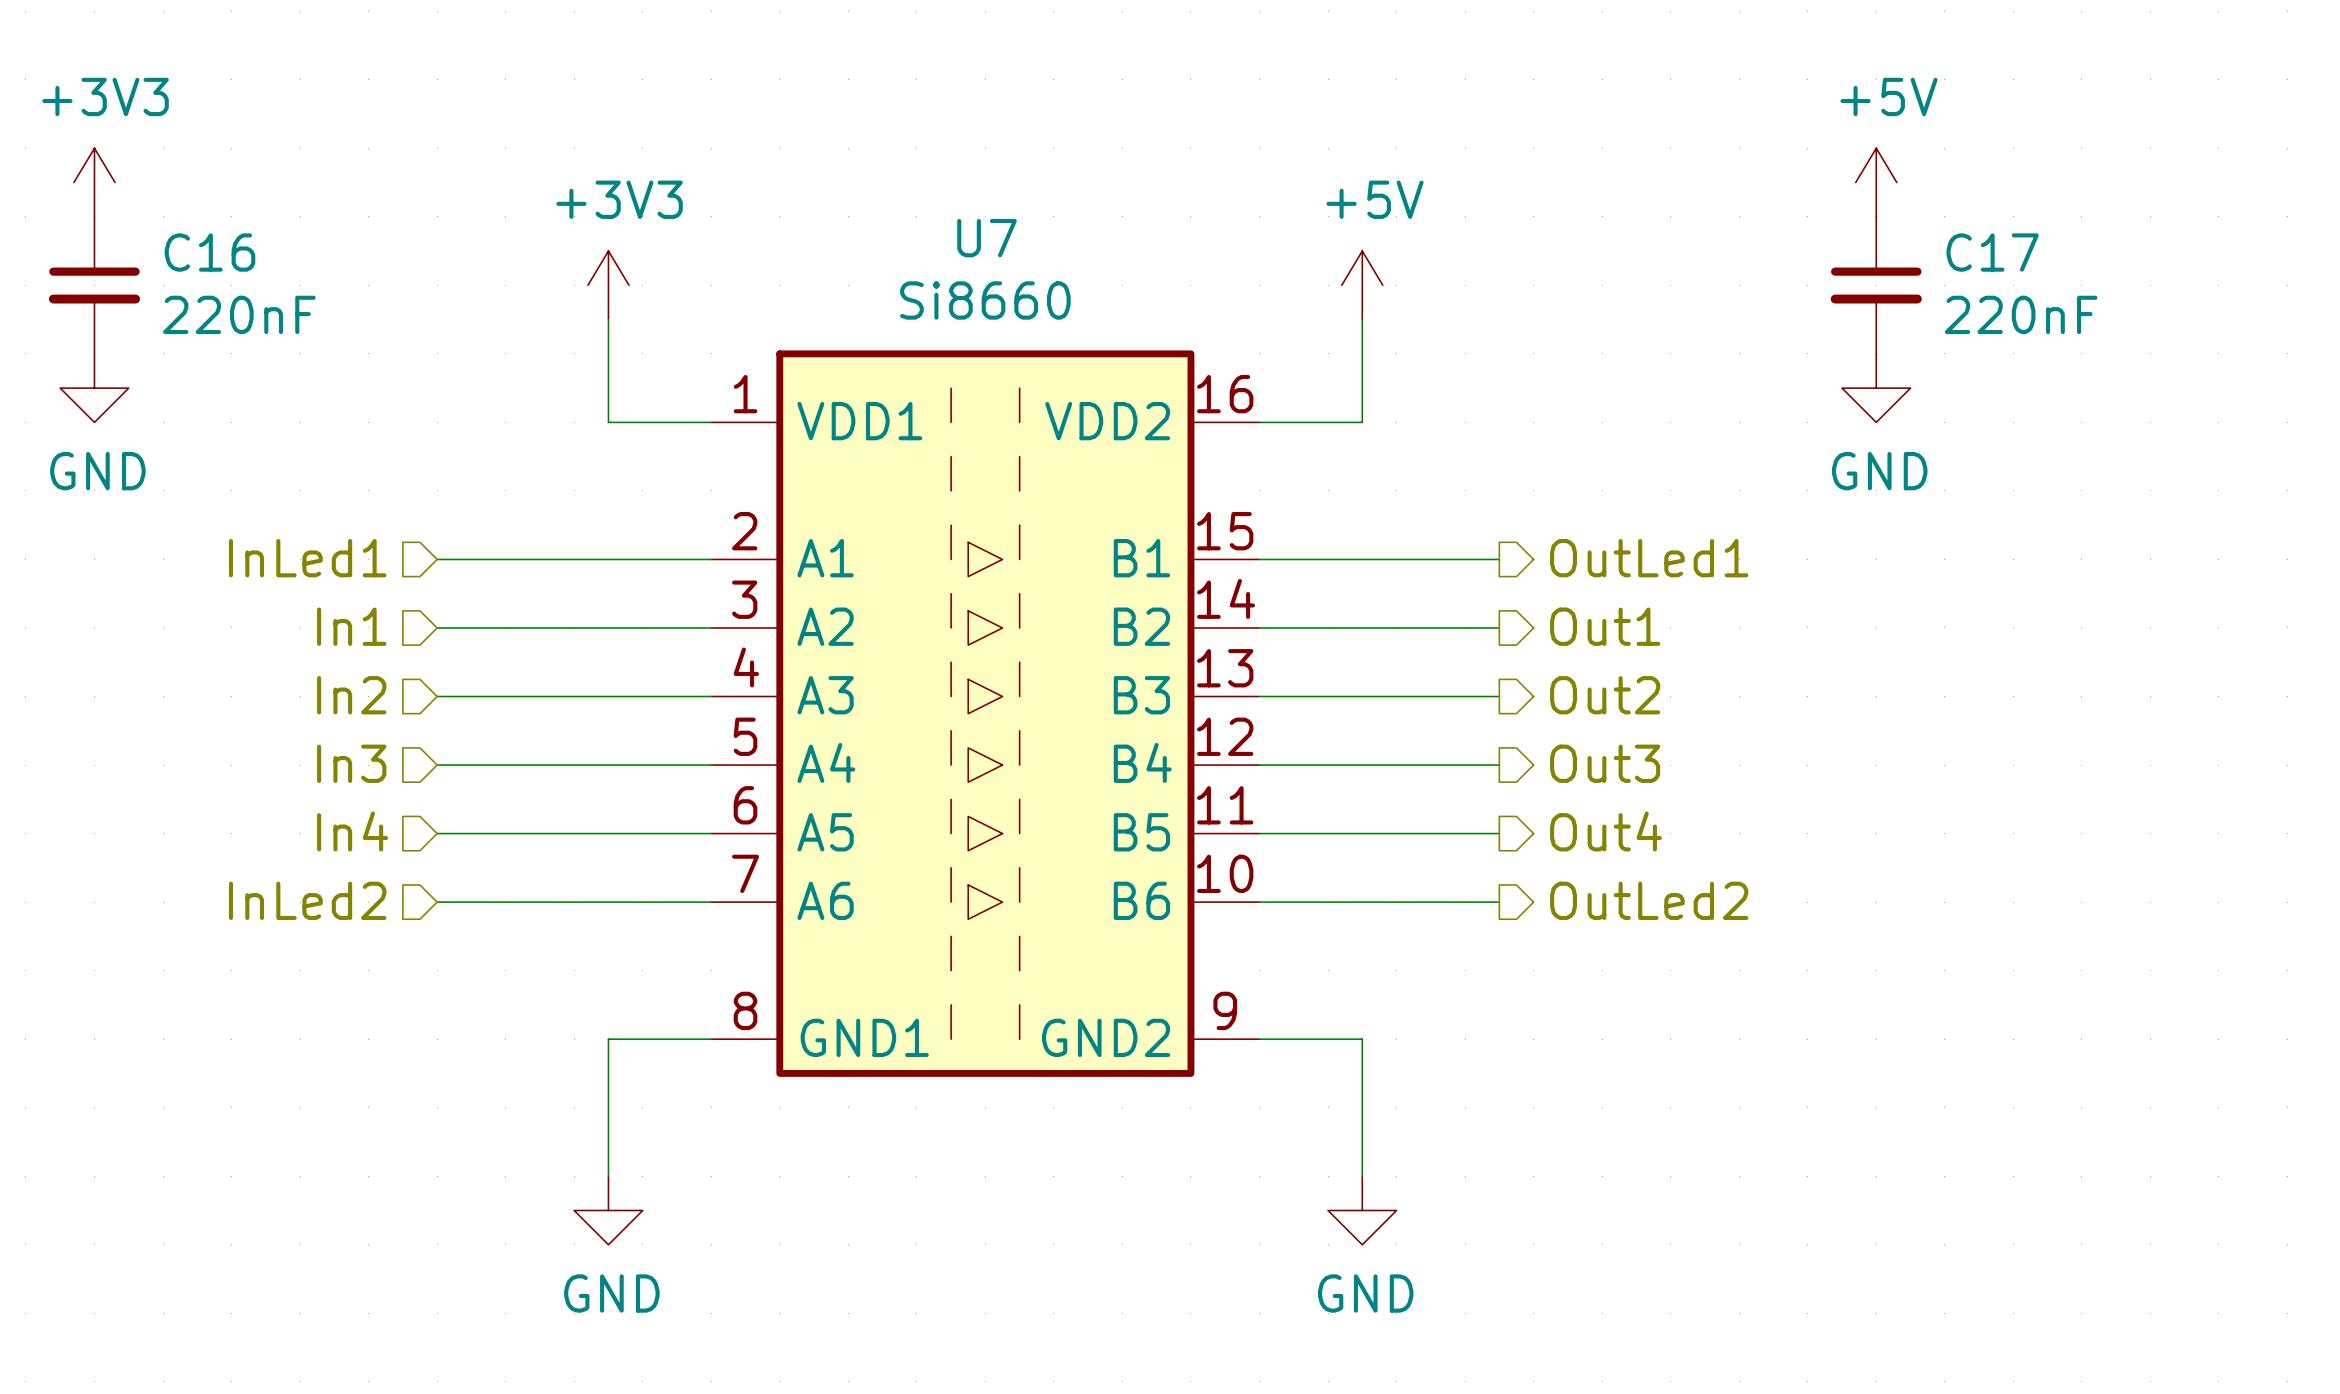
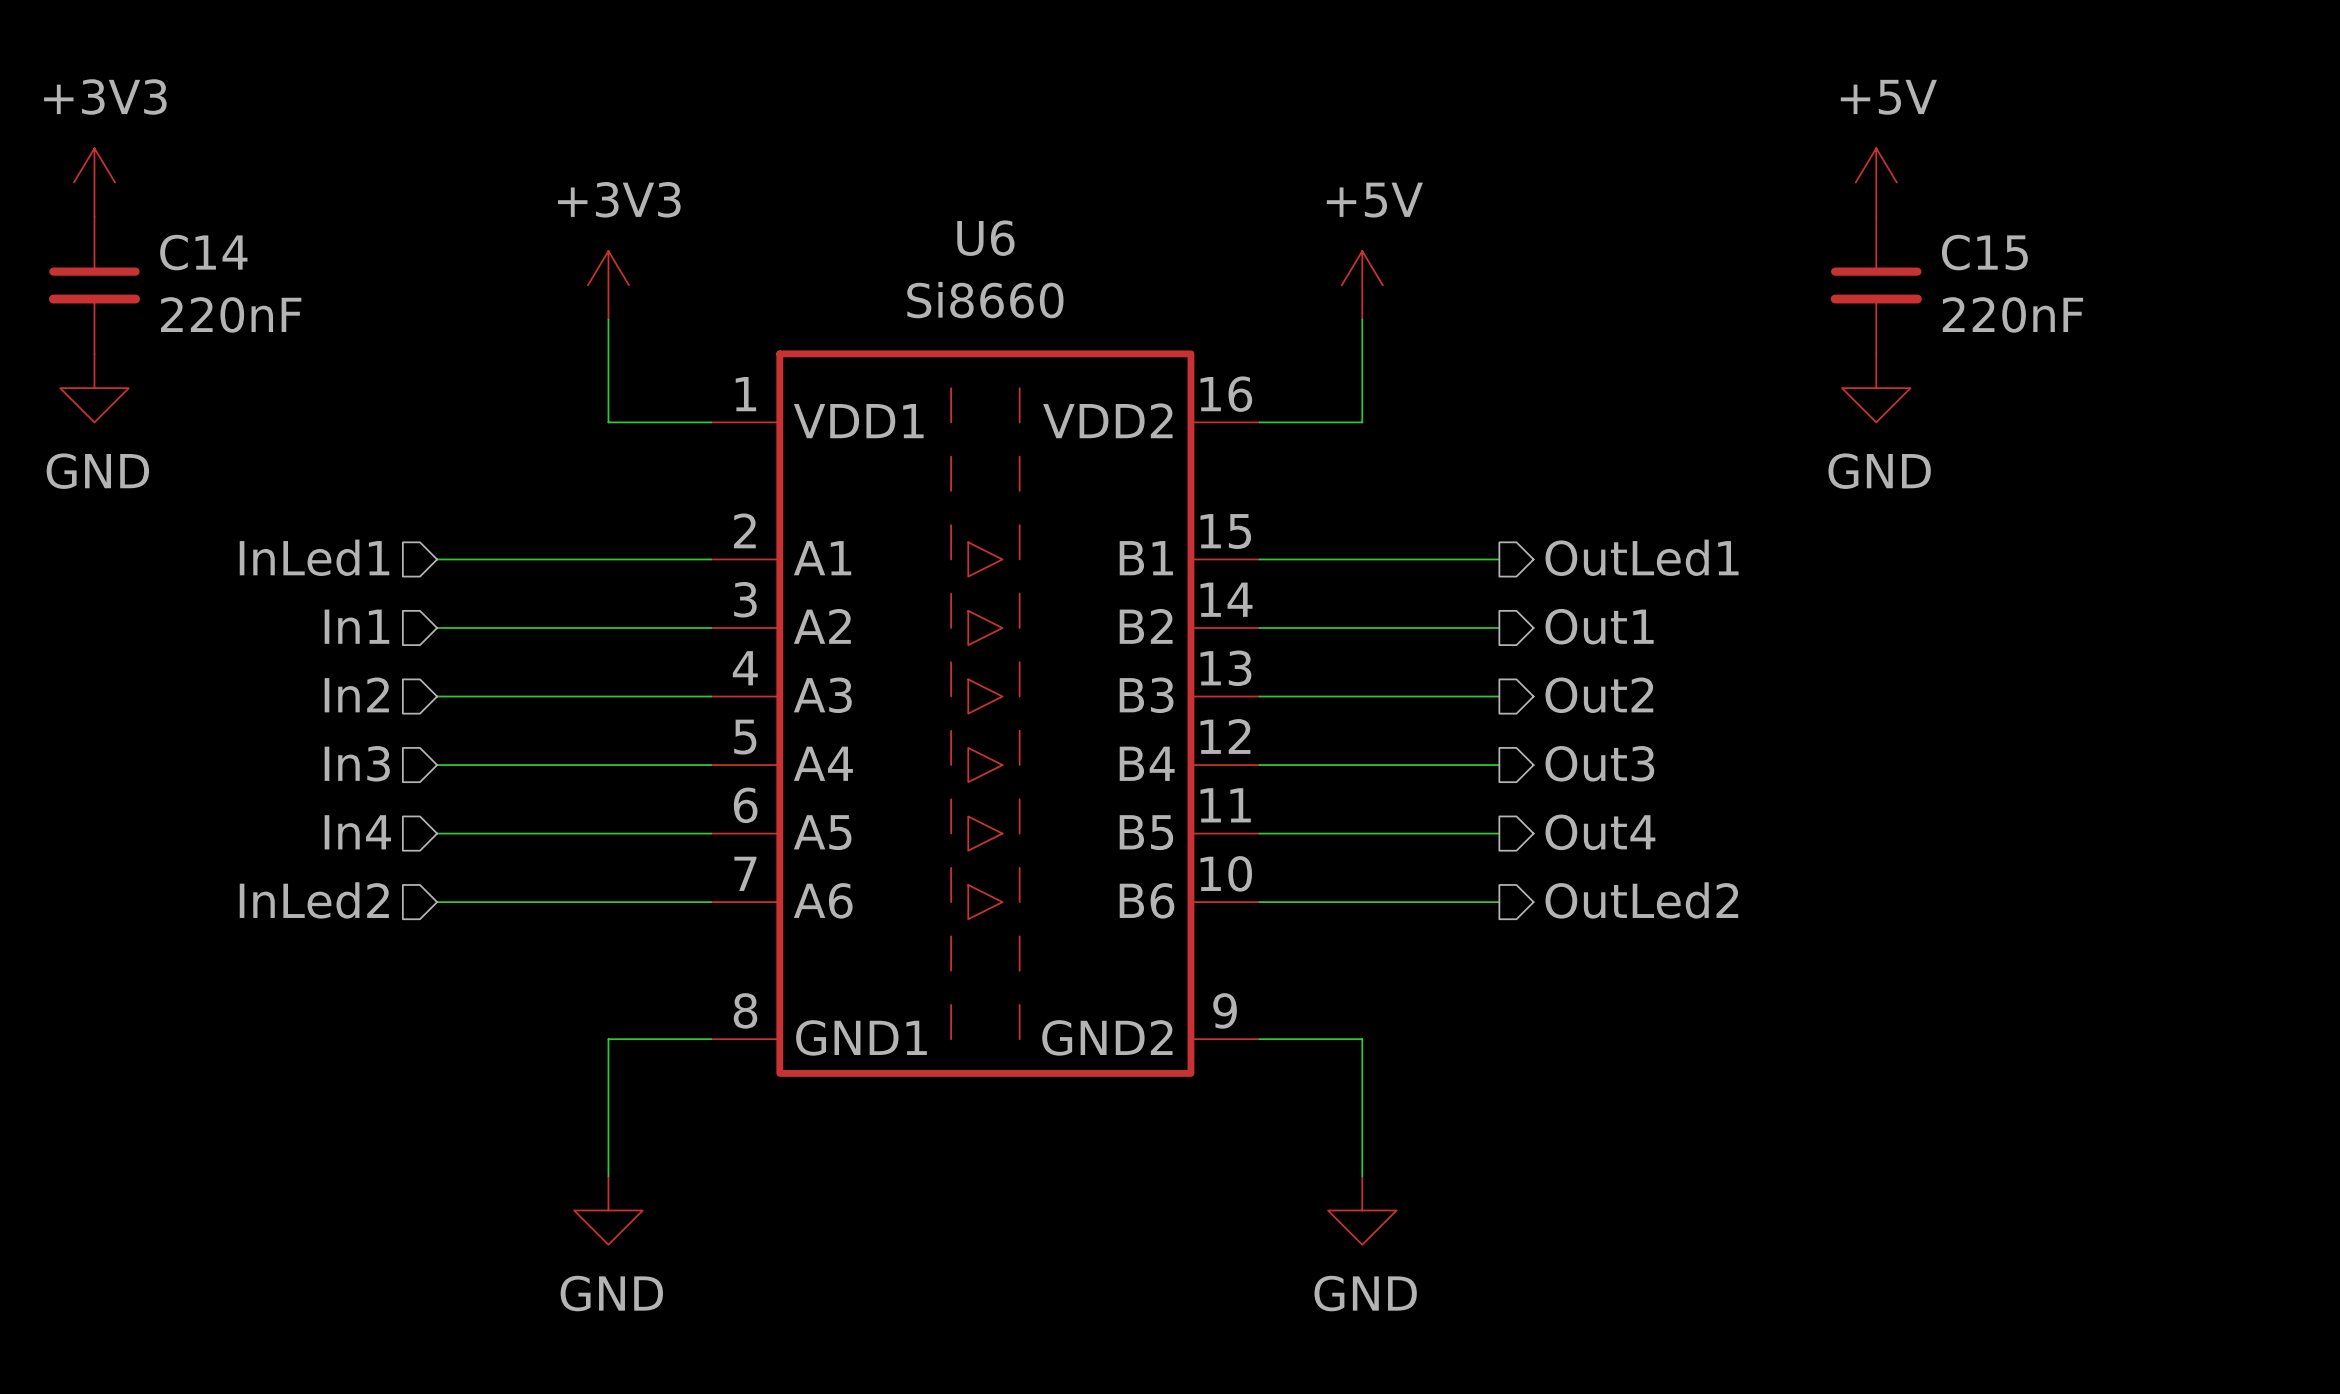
U7 name: U7 (987, 238) -> U6 (985, 238)
C16 name: C16 (210, 252) -> C14 (203, 252)
C17 name: C17 (1992, 252) -> C15 (1984, 252)

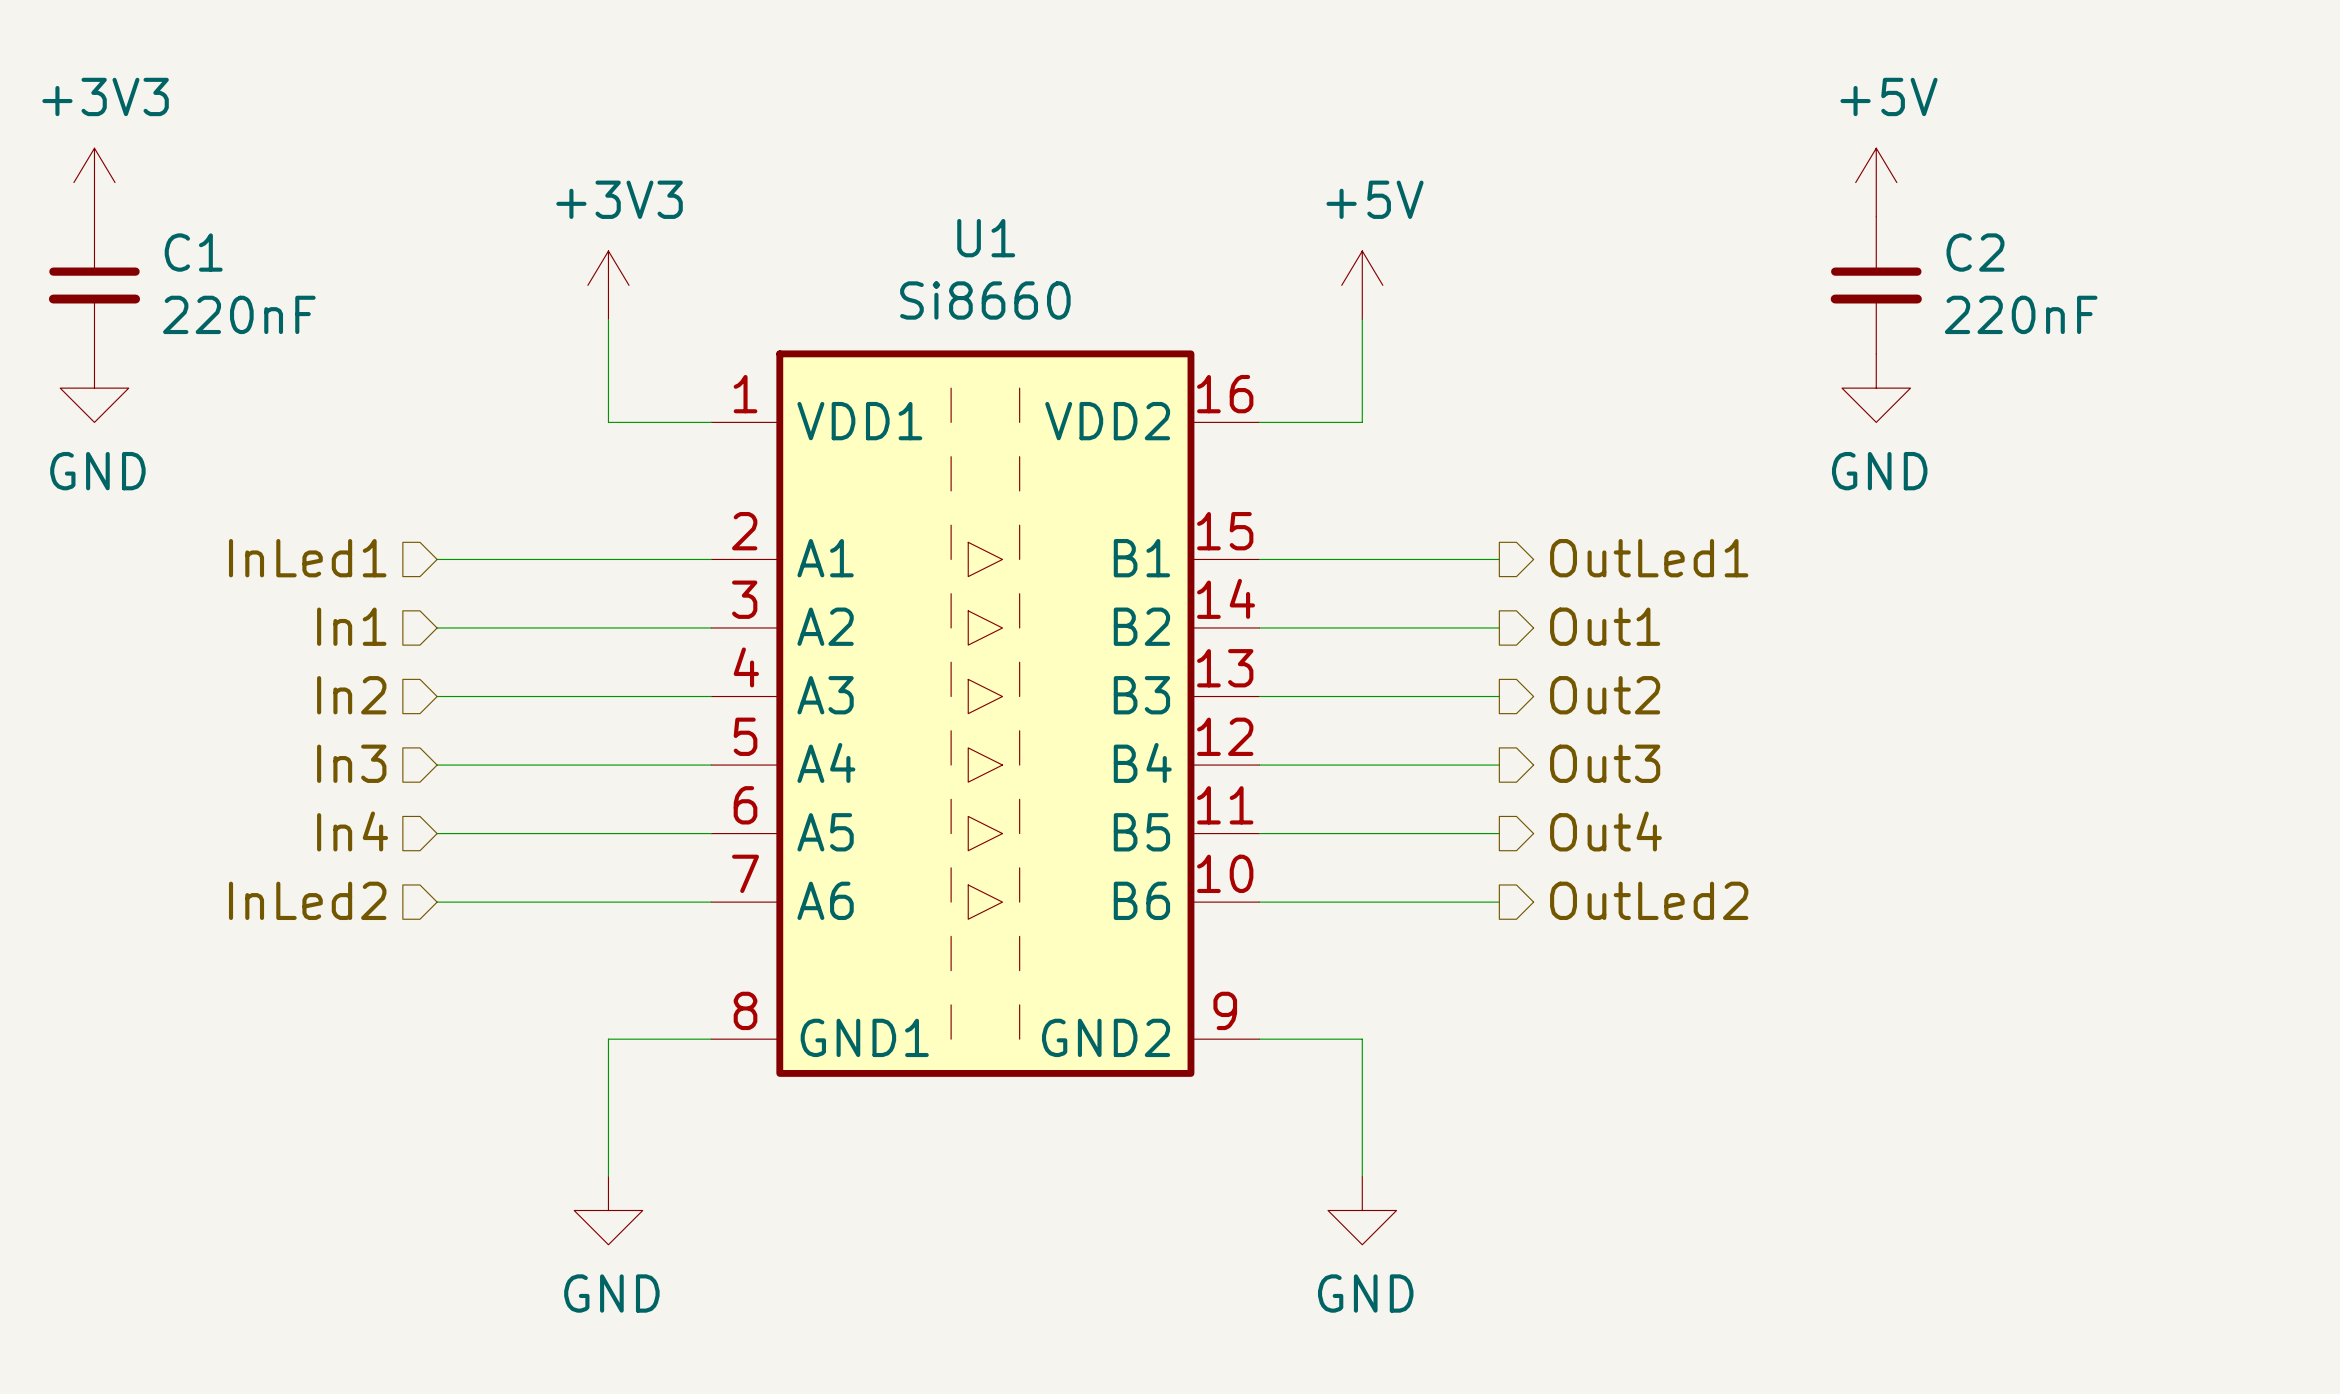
U6 name: U6 (985, 238) -> U1 (986, 238)
C14 name: C14 (203, 252) -> C1 (193, 252)
C15 name: C15 (1984, 252) -> C2 (1975, 252)

